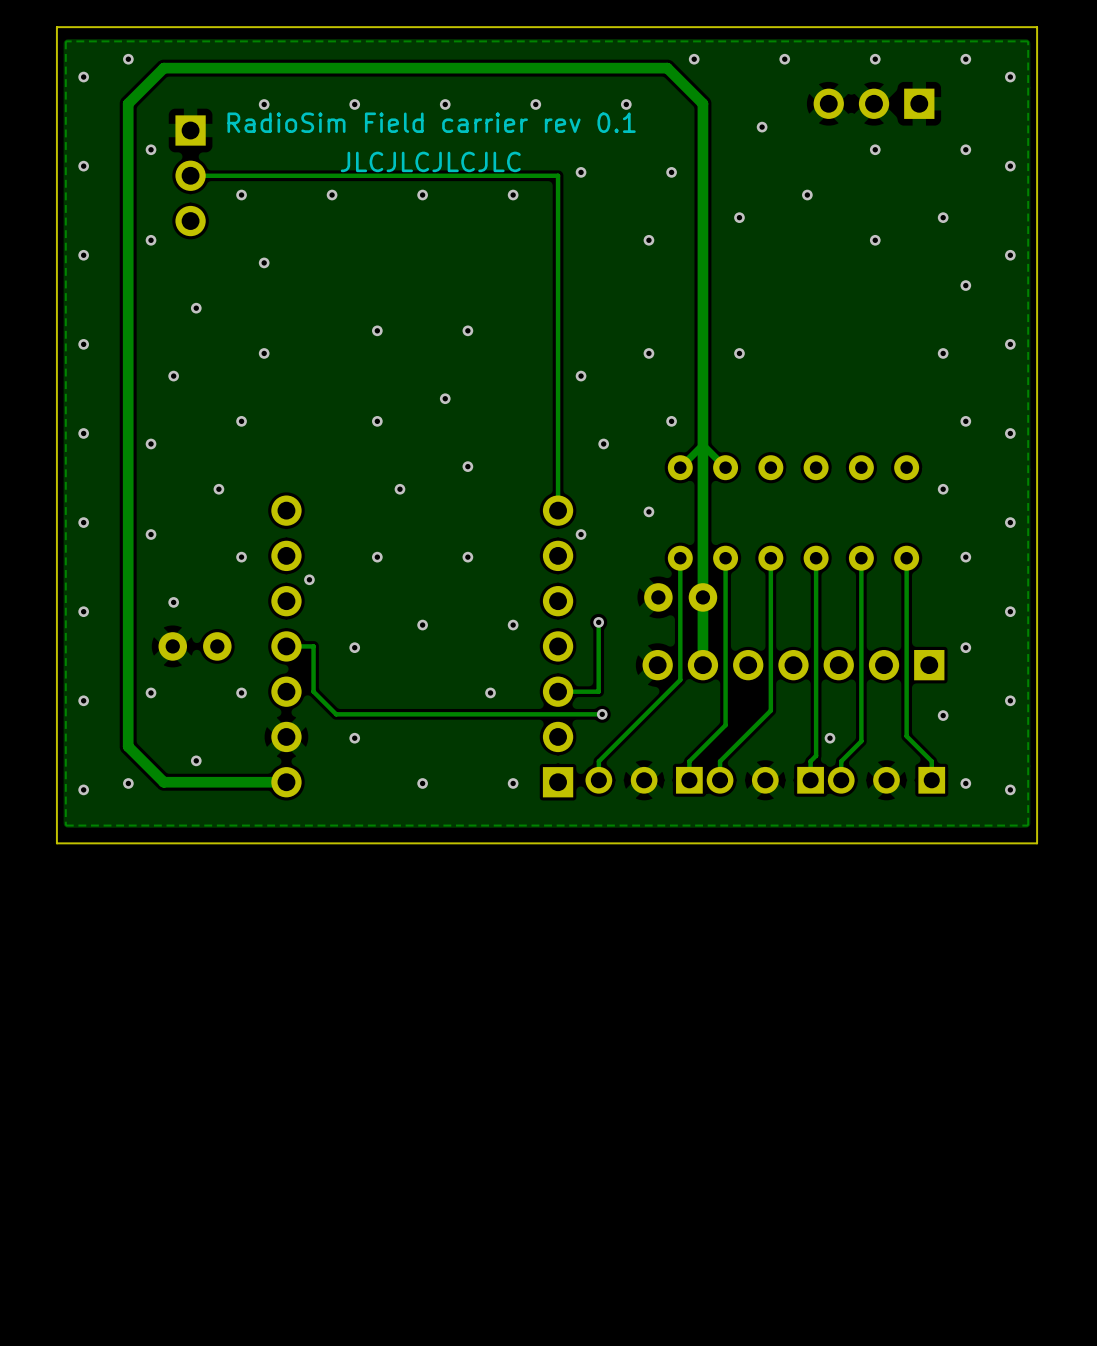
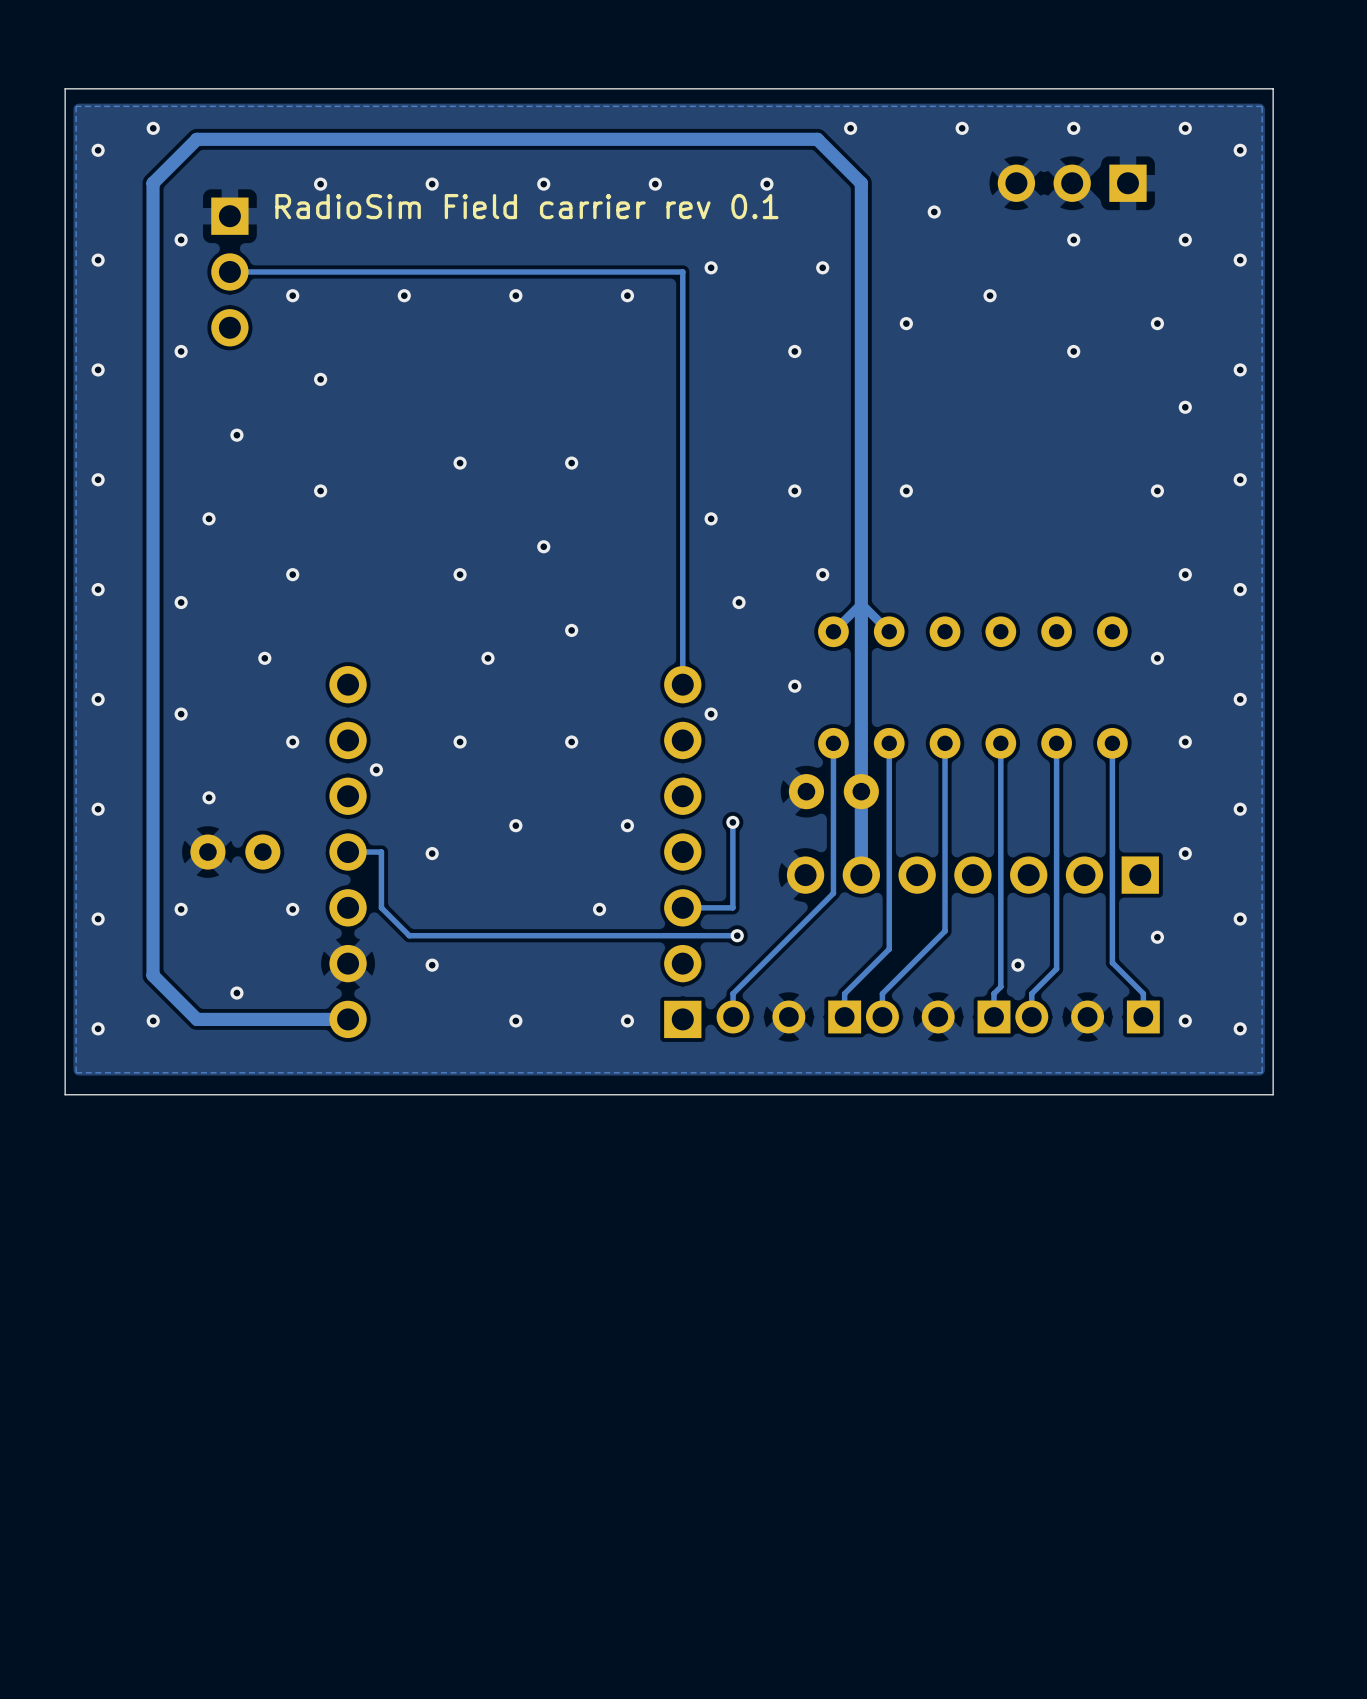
text: JLCJLCJLCJLC (430, 161) -> none

